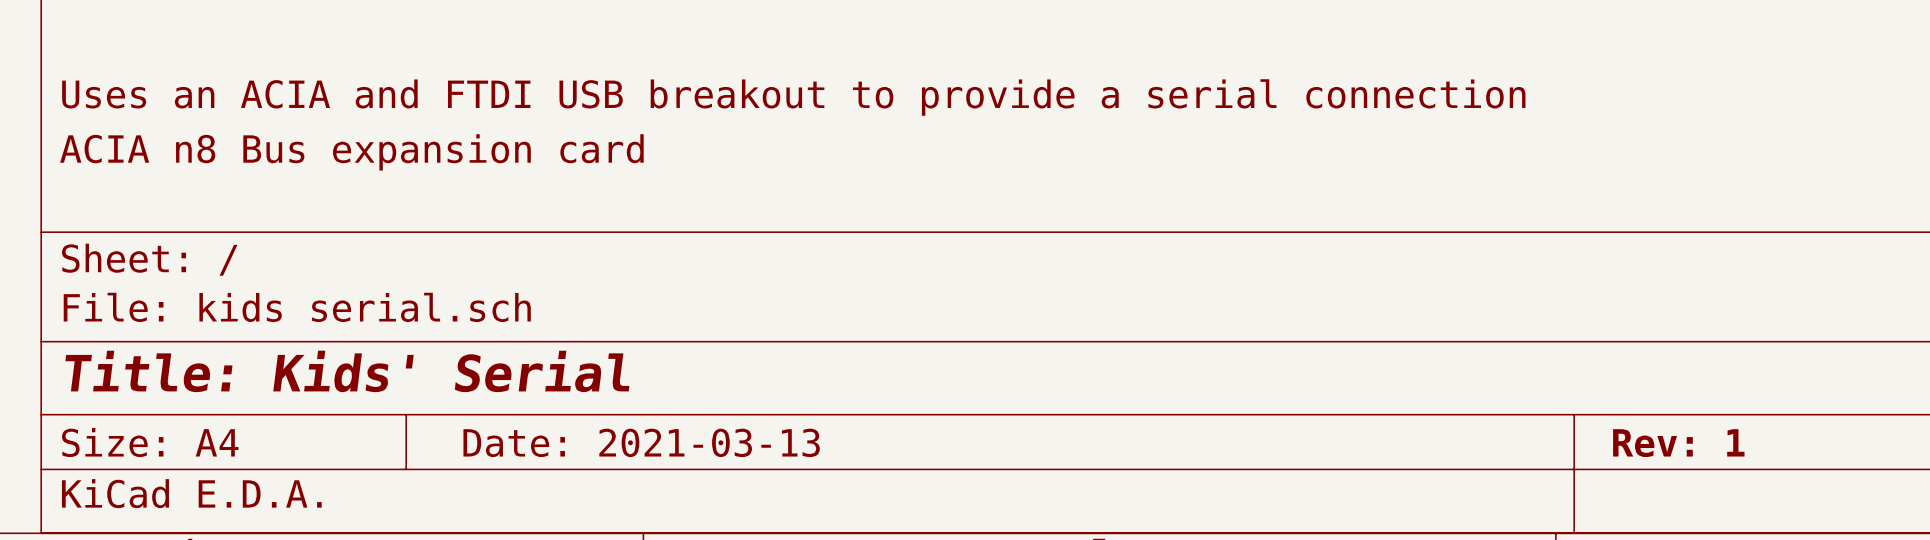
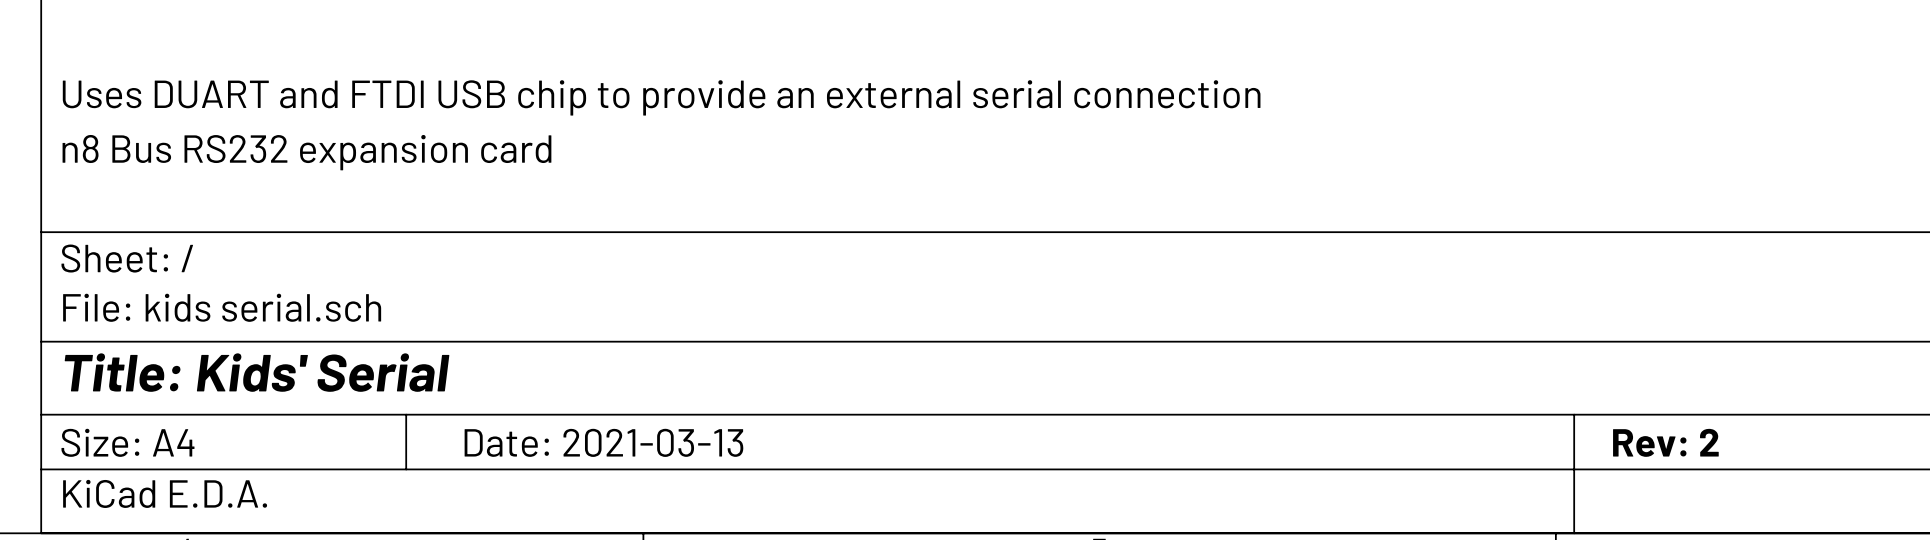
title block: Uses an ACIA and FTDI USB breakout to provide a serial connection (793, 97) -> Uses DUART and FTDI USB chip to provide an external serial connection (661, 97)
title block: ACIA n8 Bus expansion card (351, 152) -> n8 Bus RS232 expansion card (306, 152)
title block: Rev: 1 (1678, 443) -> Rev: 2 (1665, 442)

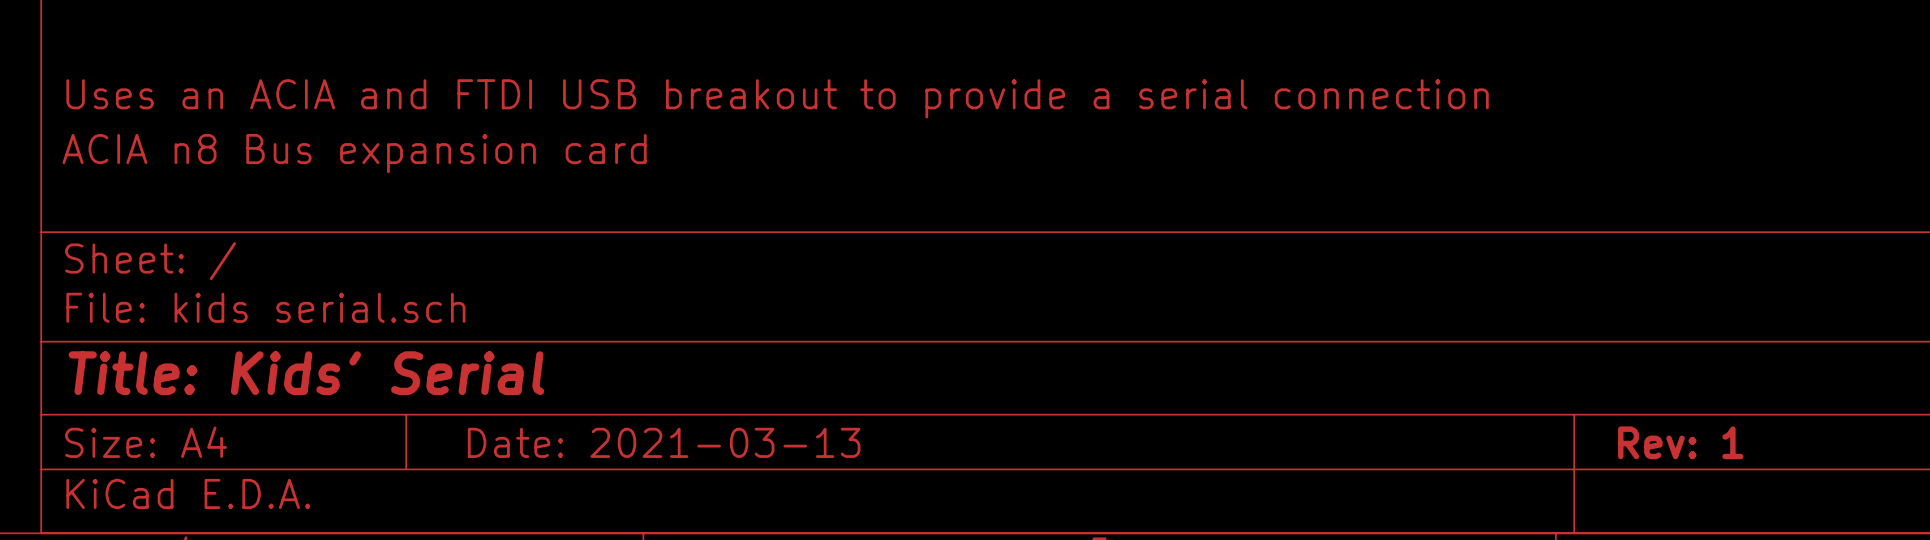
title block: Uses DUART and FTDI USB chip to provide an external serial connection (661, 97) -> Uses an ACIA and FTDI USB breakout to provide a serial connection (777, 98)
title block: n8 Bus RS232 expansion card (306, 152) -> ACIA n8 Bus expansion card (354, 153)
title block: Rev: 2 (1665, 442) -> Rev: 1 (1680, 442)

